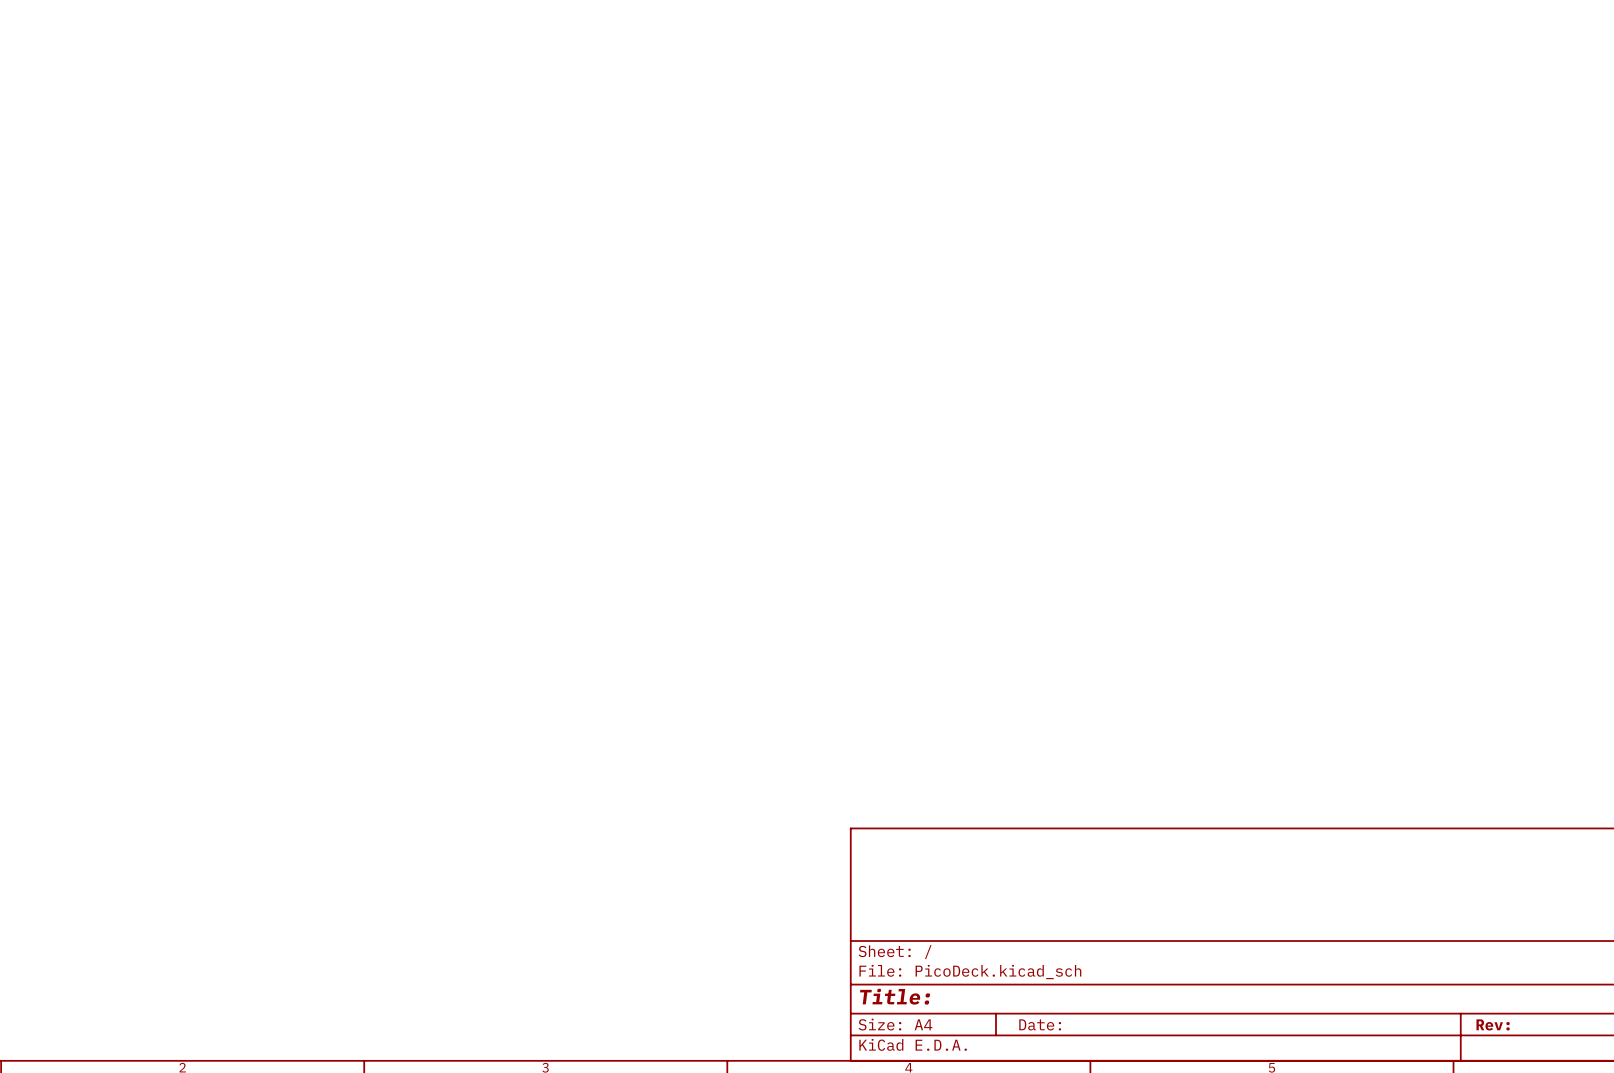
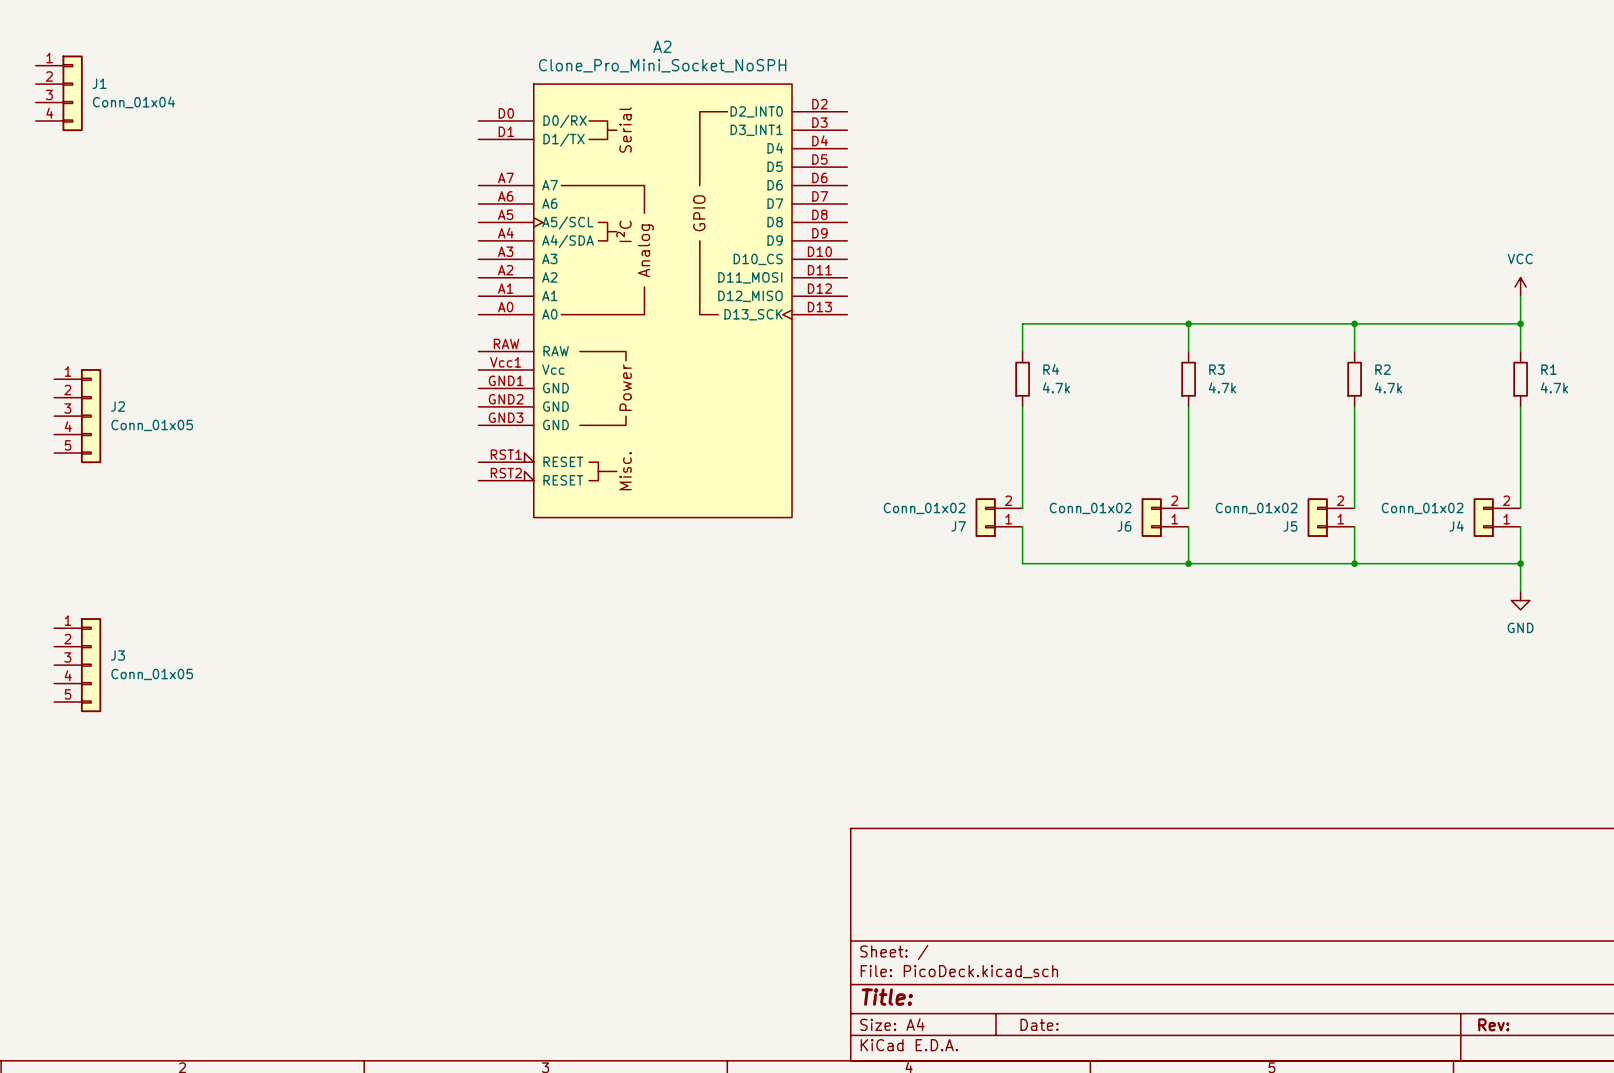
J1: none -> Conn_01x04 (59, 93)
power symbol: none -> VCC (1520, 286)
wire: none -> (1520, 296) (1520, 351)
A2: none -> Clone_Pro_Mini_Socket_NoSPH (662, 300)
wire: none -> (1188, 323) (1188, 351)
junction: none -> (1188, 323)
wire: none -> (1354, 323) (1354, 351)
junction: none -> (1354, 323)
wire: none -> (1520, 323) (1022, 323) (1022, 351)
junction: none -> (1520, 323)
R4: none -> 4.7k (1022, 379)
R3: none -> 4.7k (1188, 379)
R2: none -> 4.7k (1354, 379)
R1: none -> 4.7k (1520, 379)
wire: none -> (1022, 406) (1022, 508)
wire: none -> (1188, 406) (1188, 508)
wire: none -> (1354, 406) (1354, 508)
wire: none -> (1520, 406) (1520, 508)
J2: none -> Conn_01x05 (77, 416)
J7: none -> Conn_01x02 (999, 517)
J6: none -> Conn_01x02 (1165, 517)
J5: none -> Conn_01x02 (1331, 517)
J4: none -> Conn_01x02 (1497, 517)
wire: none -> (1022, 526) (1022, 563) (1520, 563)
wire: none -> (1188, 526) (1188, 563)
wire: none -> (1354, 526) (1354, 563)
wire: none -> (1520, 526) (1520, 591)
junction: none -> (1188, 563)
junction: none -> (1354, 563)
junction: none -> (1520, 563)
power symbol: none -> GND (1520, 600)
J3: none -> Conn_01x05 (77, 665)

